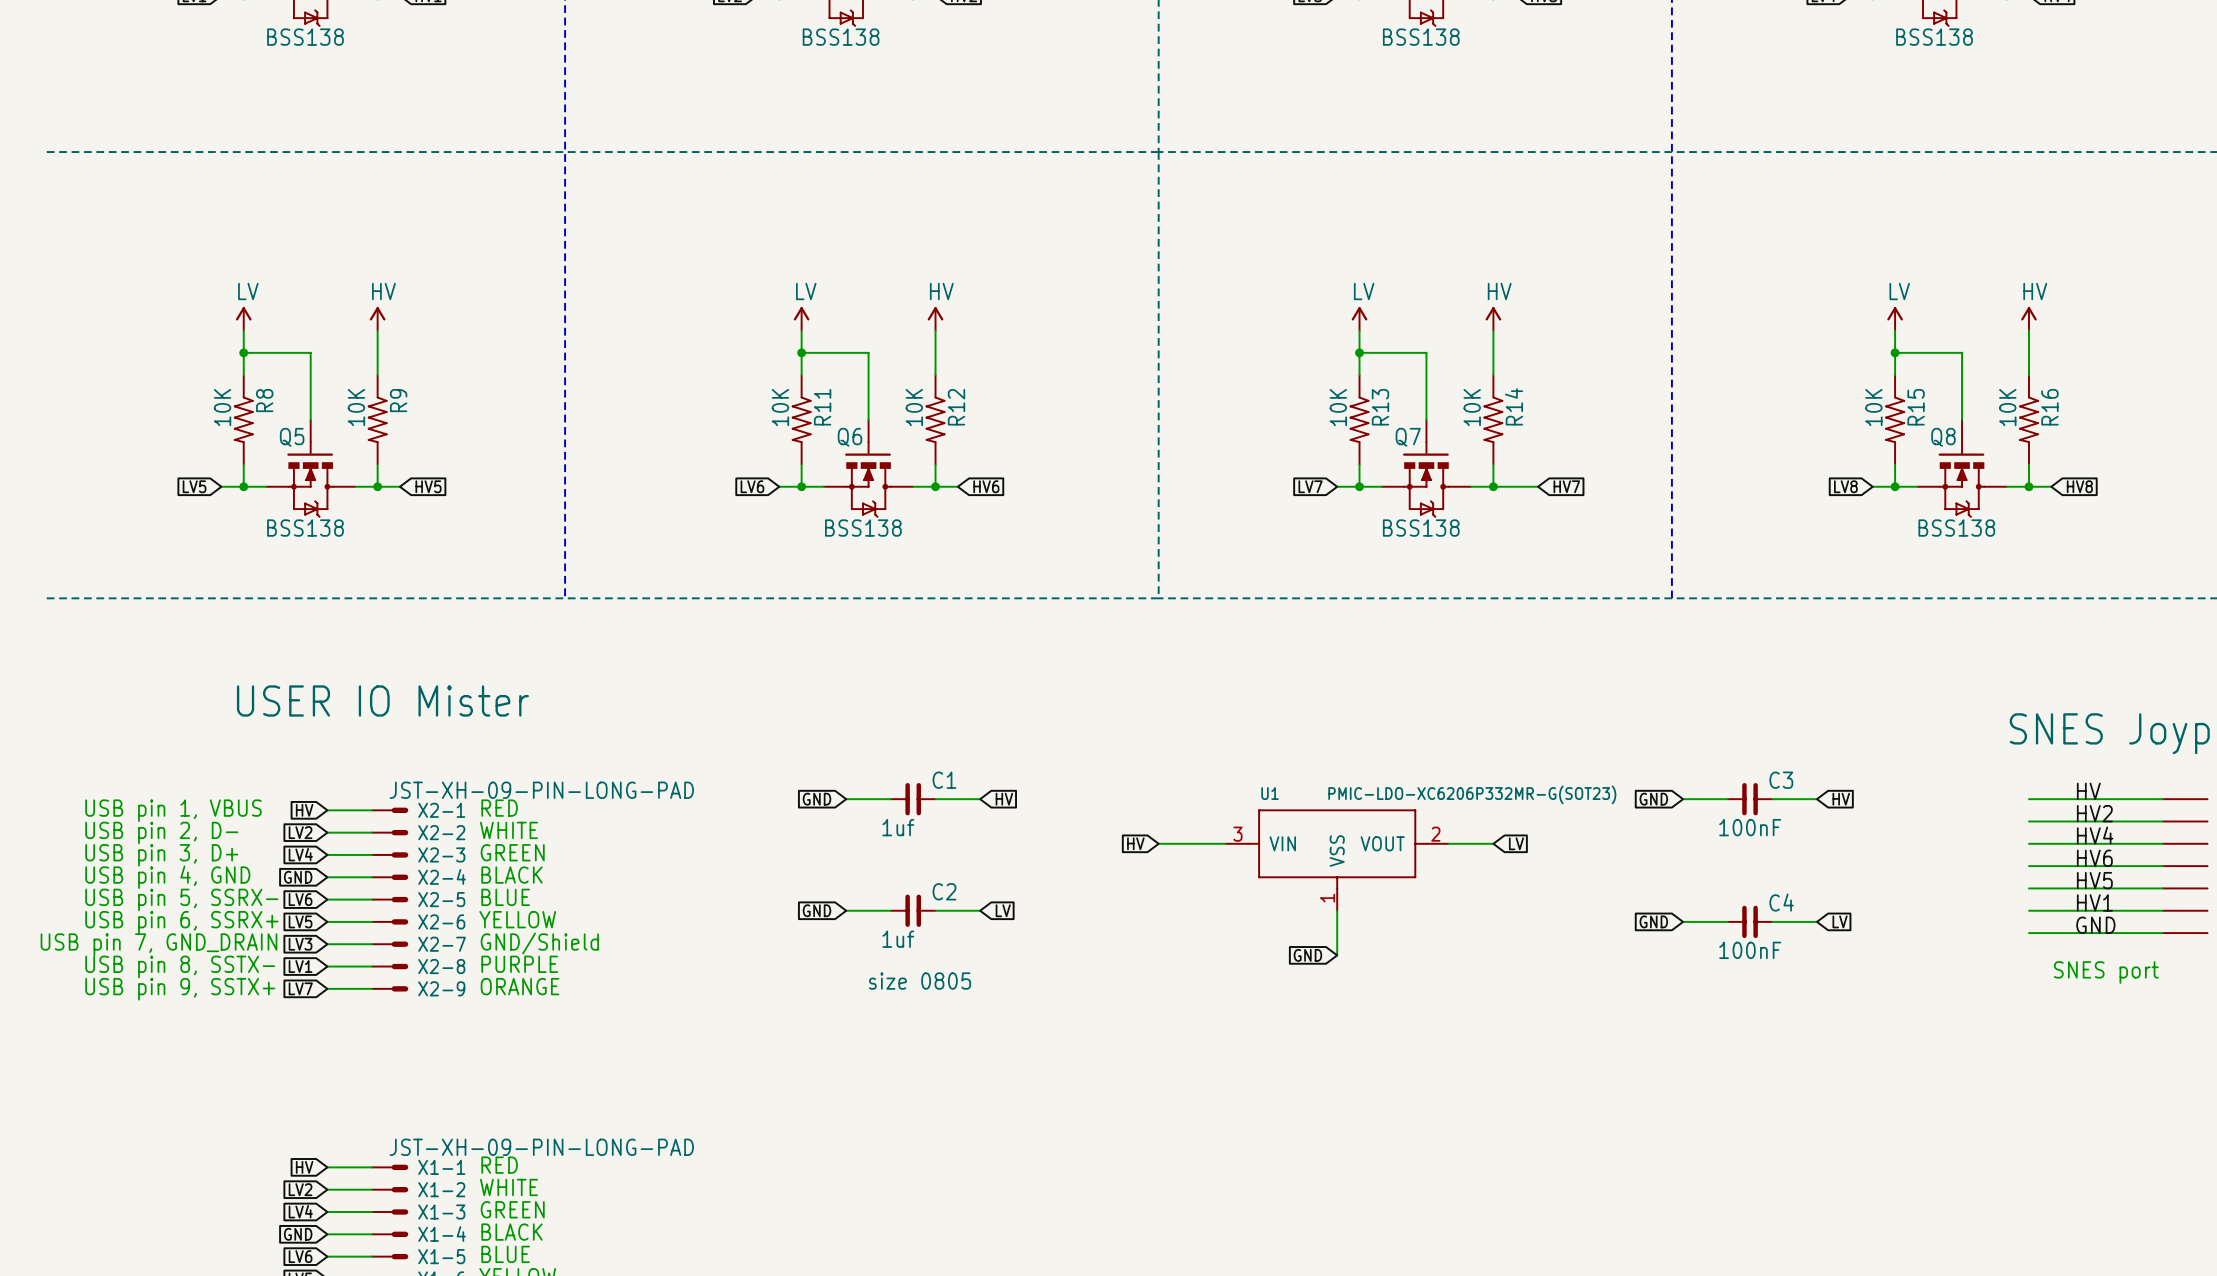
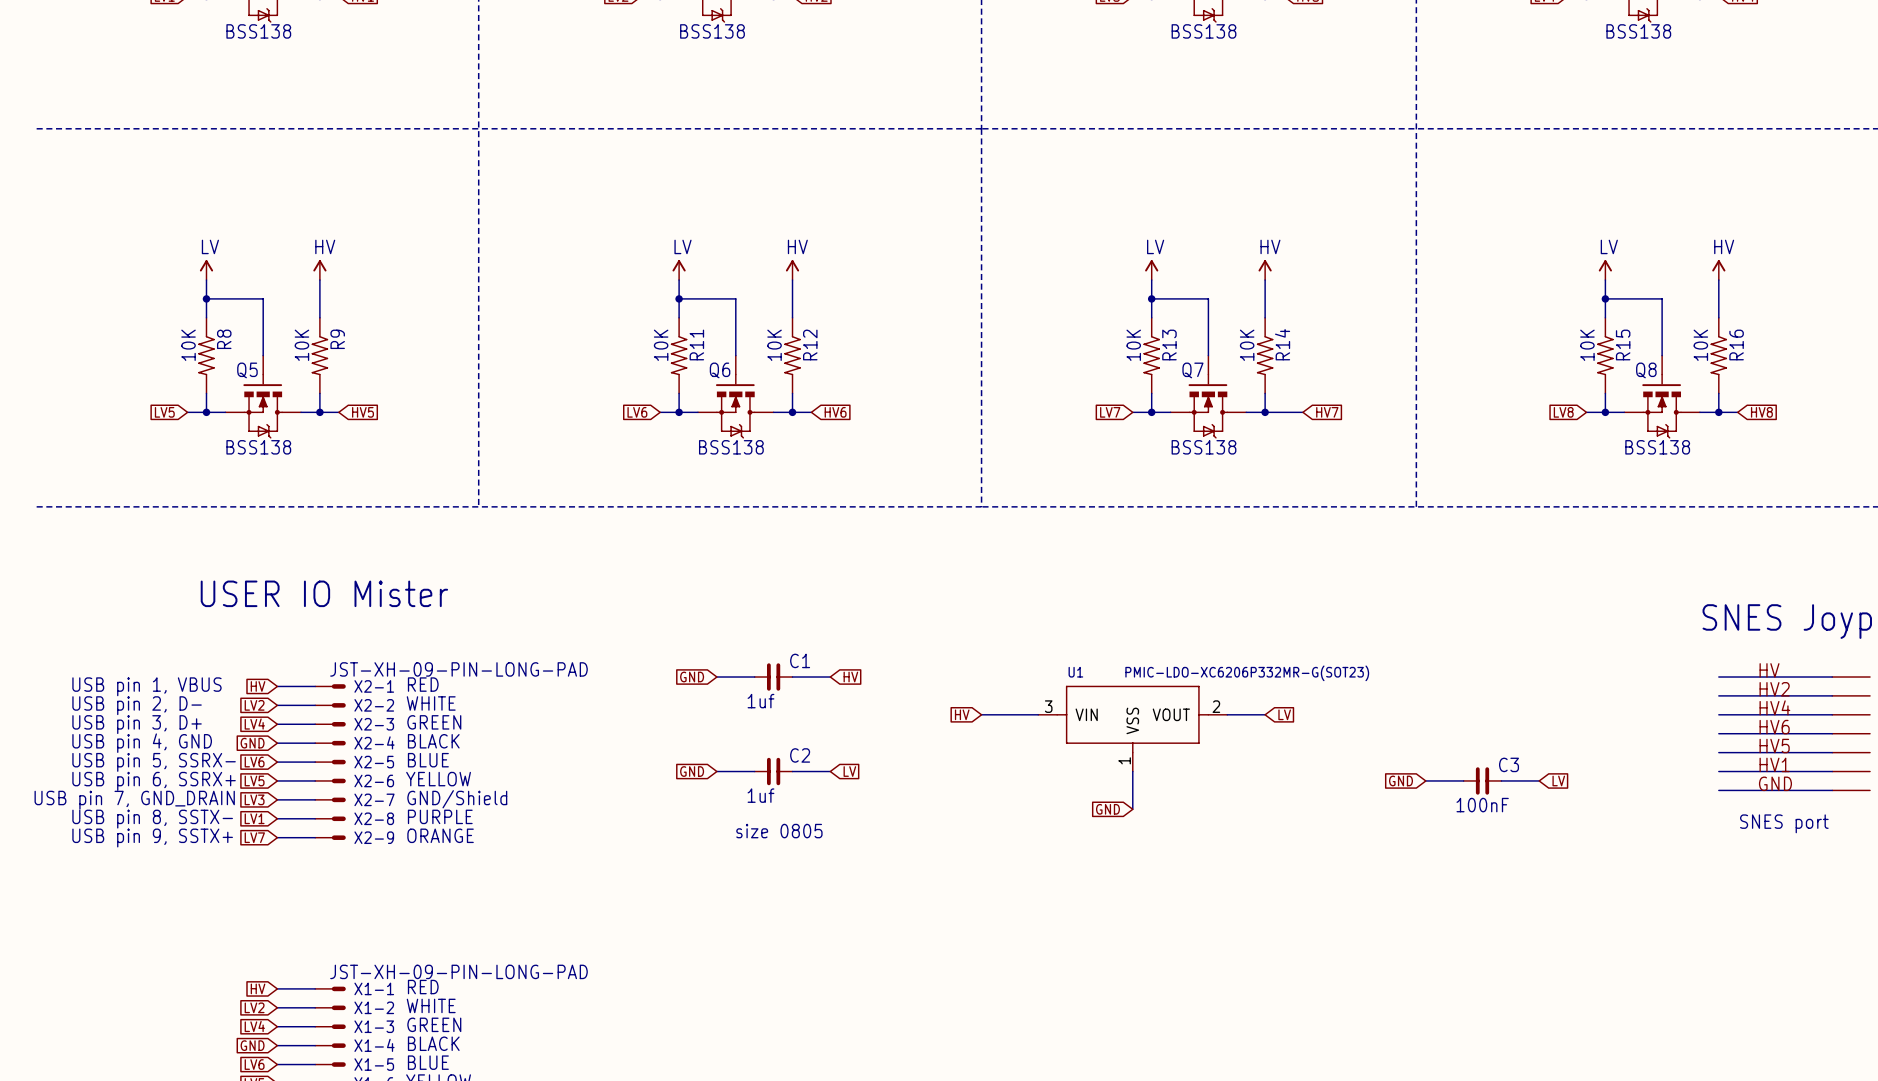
global label: GND (1653, 799) -> none
wire: (1683, 799) (1727, 799) -> none
C3: 100nF (1750, 799) -> none
wire: (1772, 799) (1816, 799) -> none
global label: HV (1841, 799) -> none
C4 name: C4 (1781, 902) -> C3 (1509, 764)

